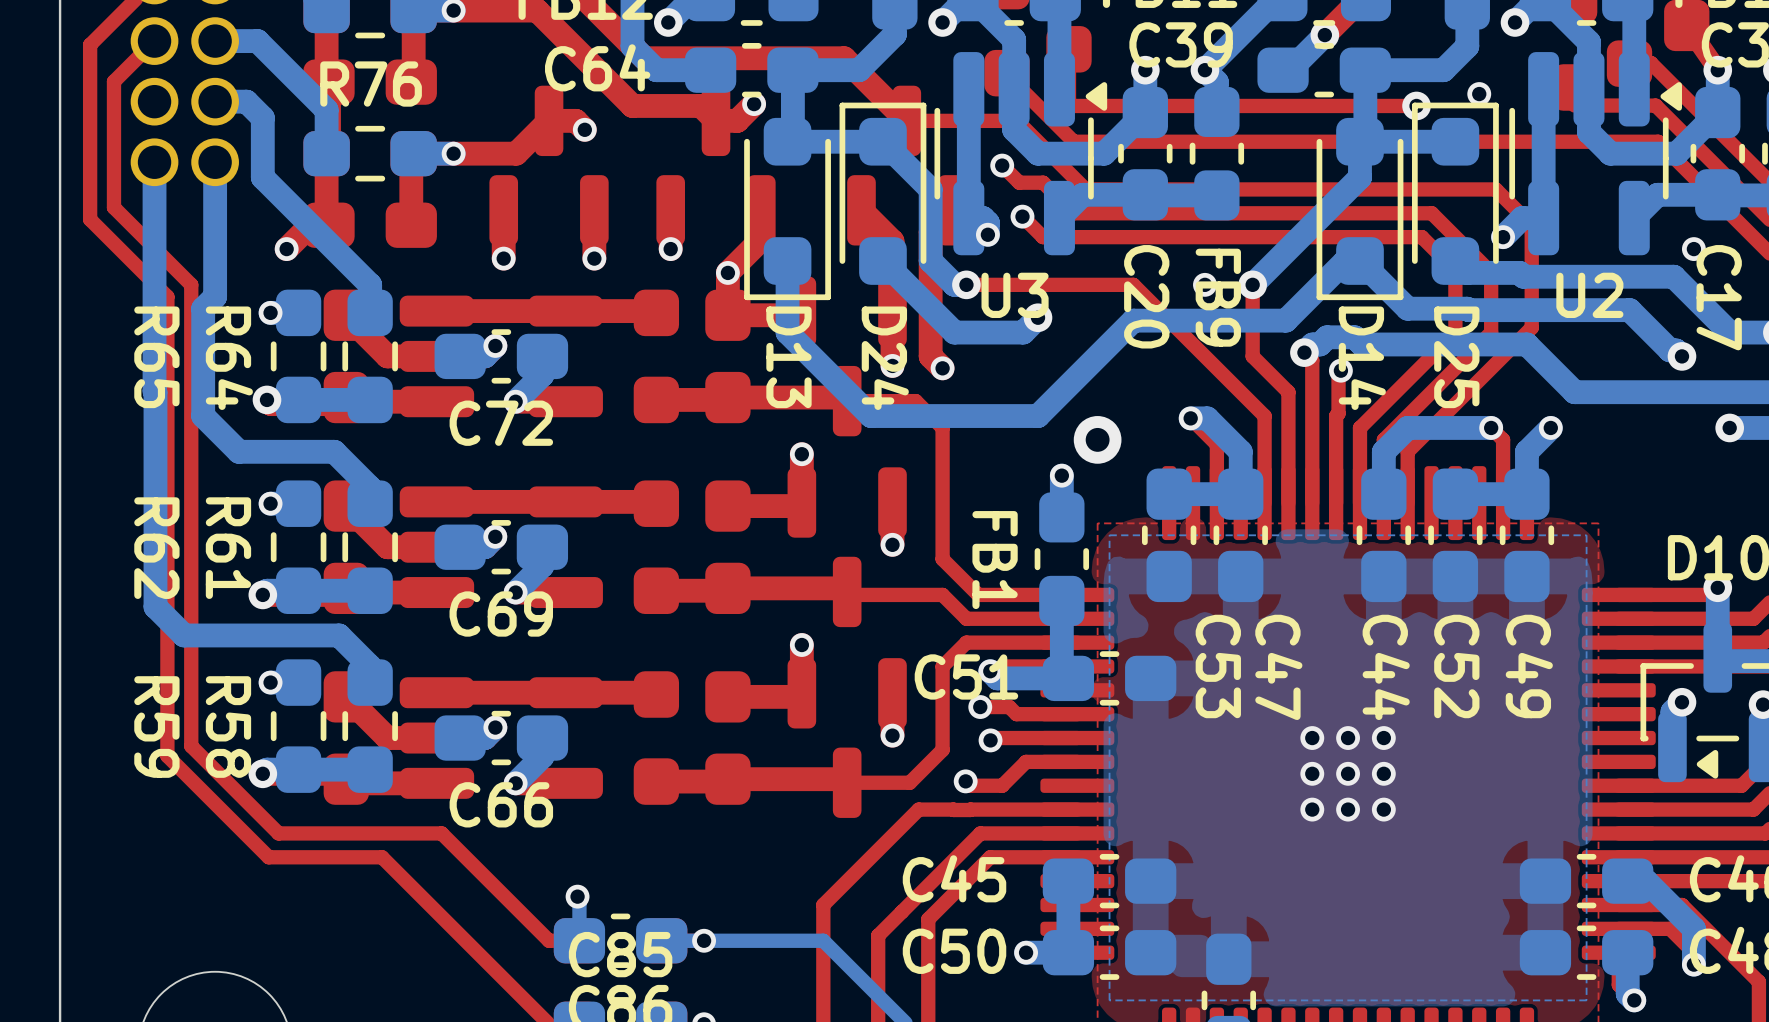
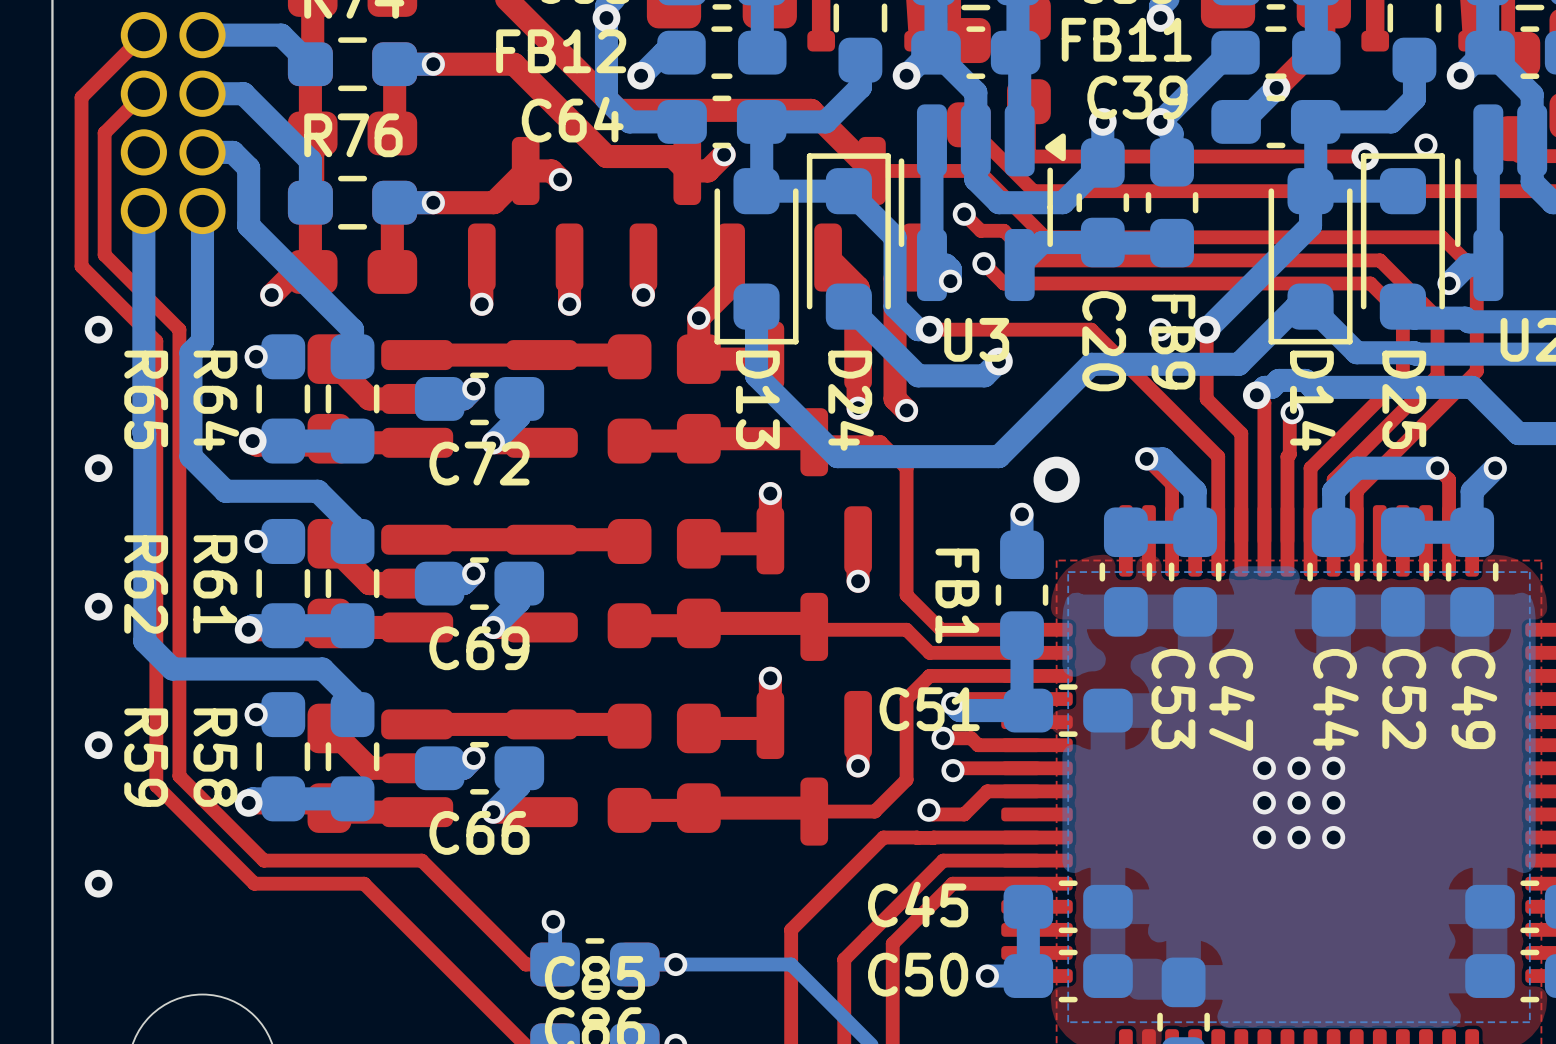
via: none -> (98, 329)
via: none -> (98, 468)
via: none -> (98, 606)
via: none -> (98, 745)
via: none -> (98, 883)

